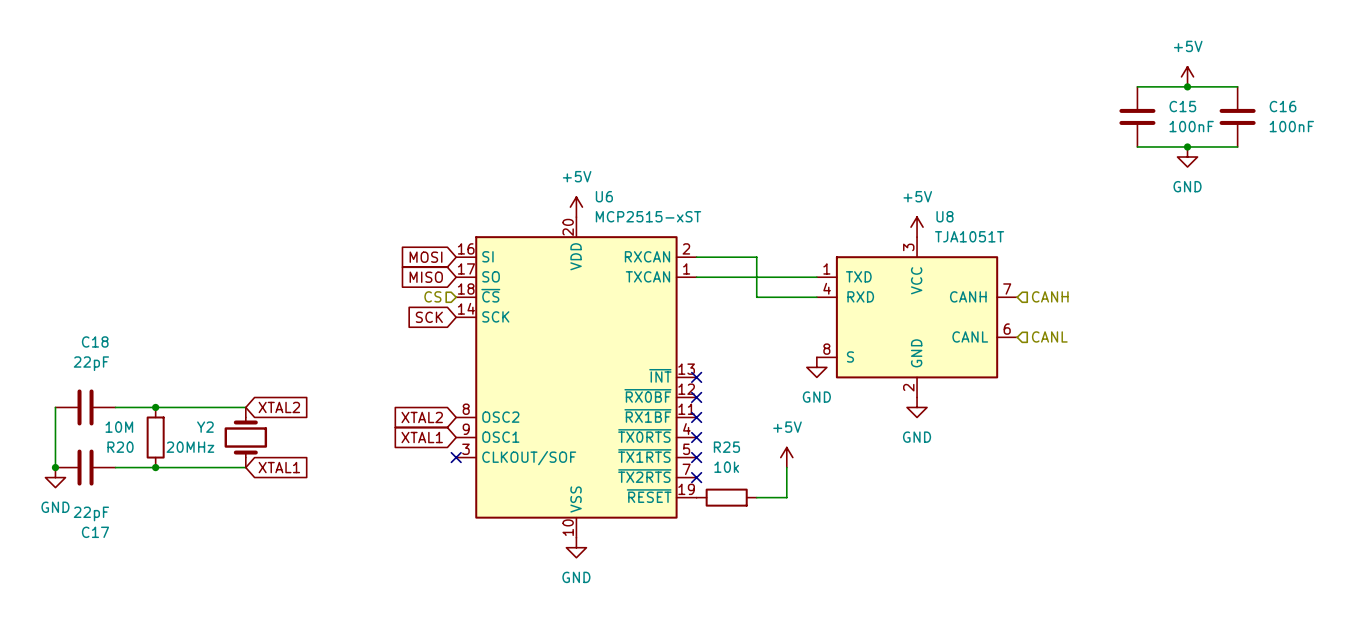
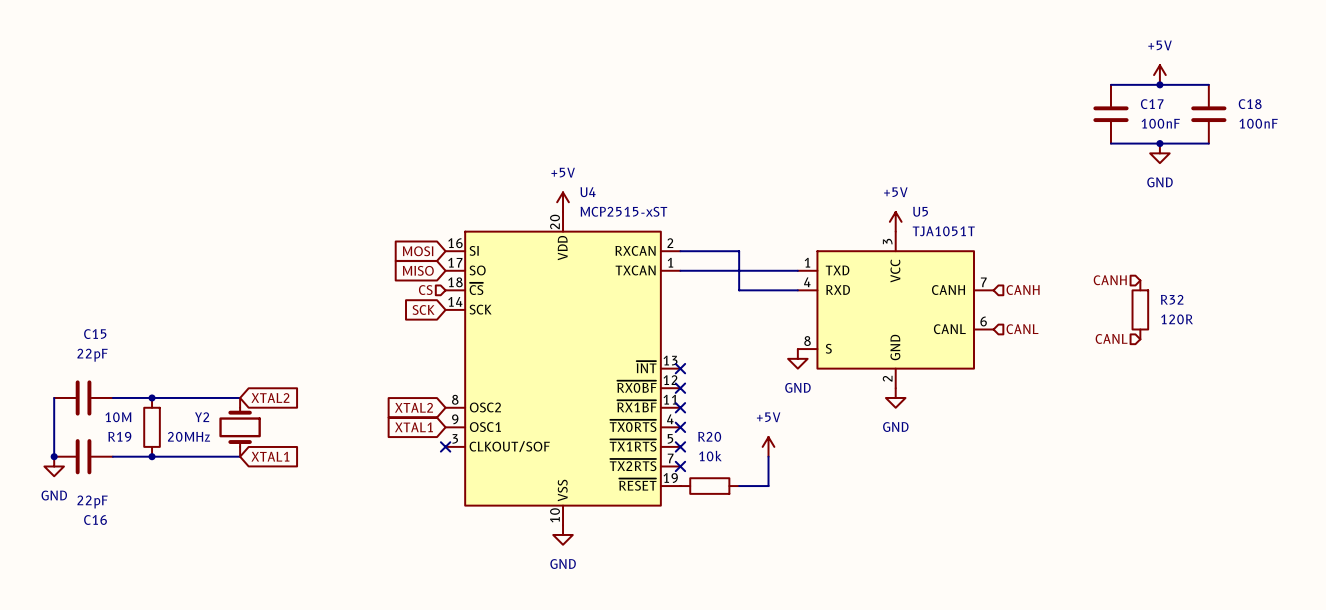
C15 name: C15 (1182, 106) -> C17 (1152, 104)
C16 name: C16 (1283, 106) -> C18 (1250, 104)
U6 name: U6 (604, 196) -> U4 (588, 192)
U8 name: U8 (944, 216) -> U5 (920, 211)
hierarchical label: none -> CANH (1110, 280)
R32: none -> 120R (1140, 309)
C18 name: C18 (95, 341) -> C15 (95, 334)
hierarchical label: none -> CANL (1111, 338)
R20 name: R20 (120, 447) -> R19 (119, 436)
R25 name: R25 (726, 447) -> R20 (709, 436)
C17 name: C17 (95, 532) -> C16 (95, 519)

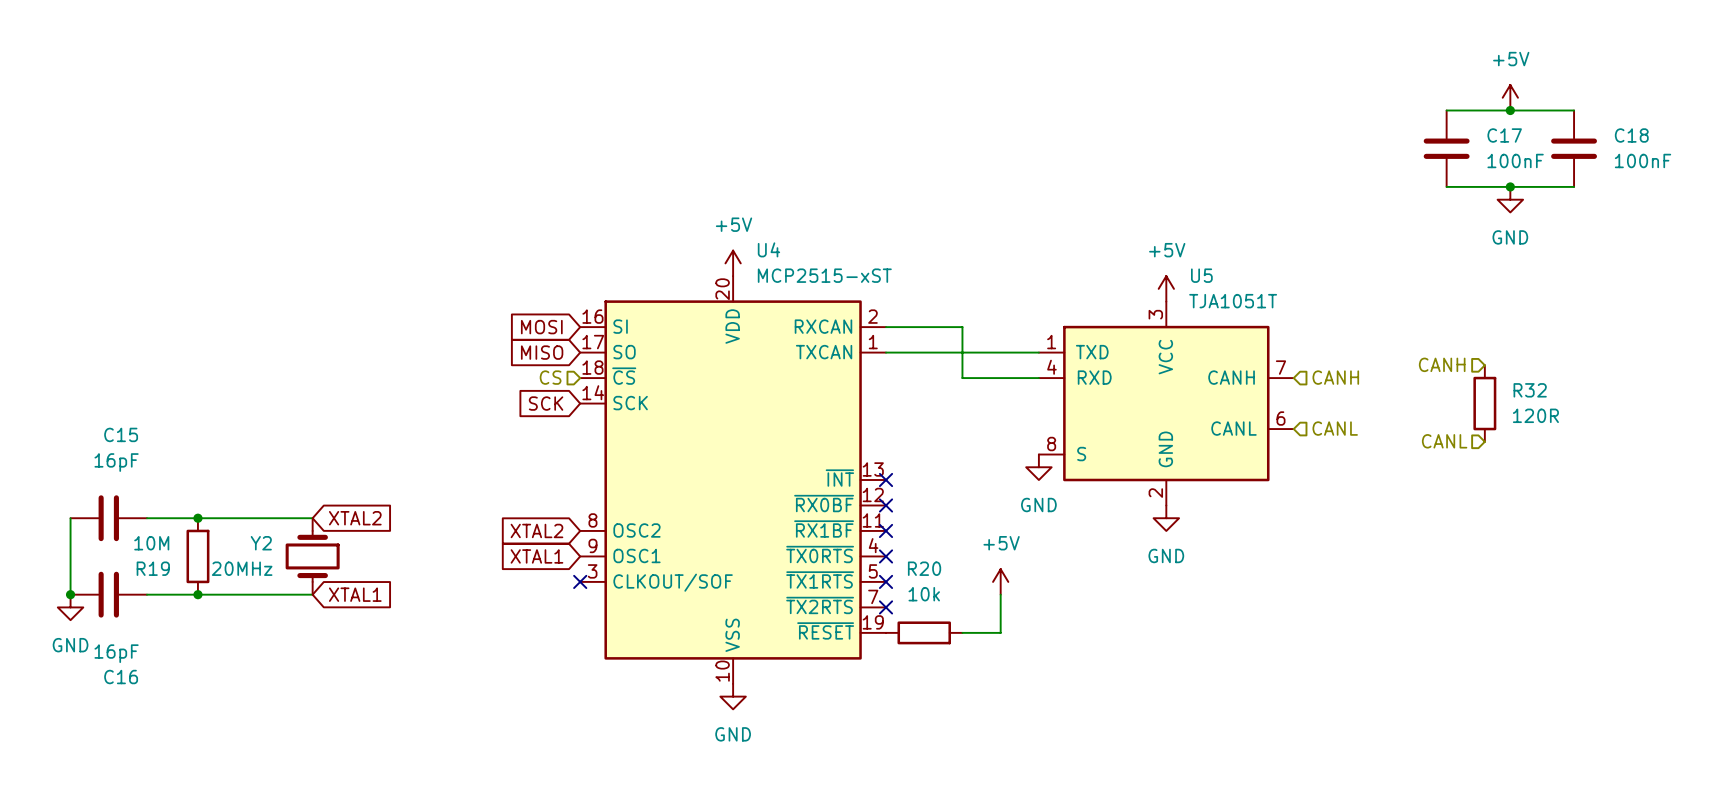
C15 value: 22pF (92, 355) -> 16pF (116, 462)
C16 value: 22pF (92, 501) -> 16pF (116, 653)

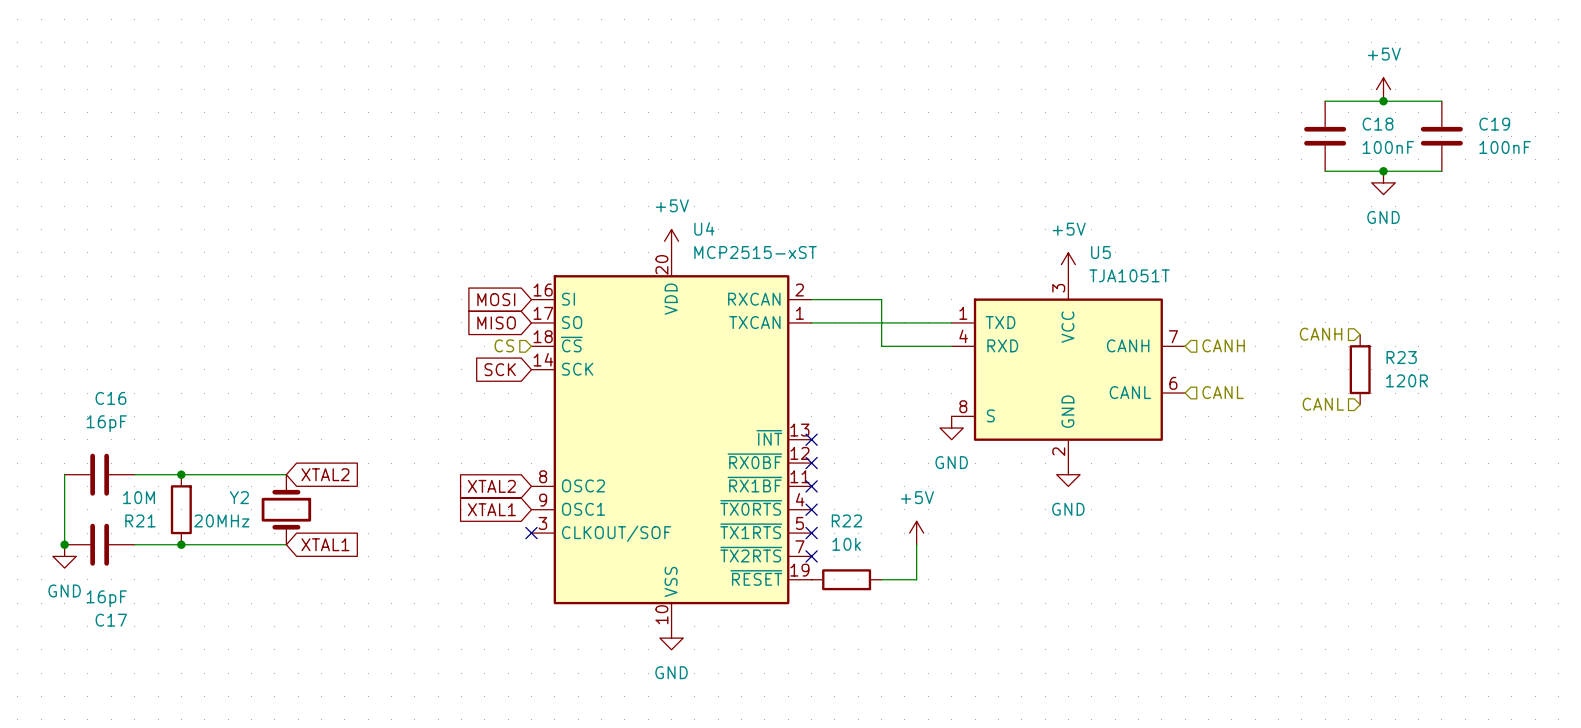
C17 name: C17 (1504, 135) -> C18 (1378, 124)
C18 name: C18 (1631, 135) -> C19 (1494, 124)
R32 name: R32 (1530, 390) -> R23 (1401, 357)
C15 name: C15 (121, 434) -> C16 (110, 398)
R19 name: R19 (153, 568) -> R21 (140, 520)
R20 name: R20 (924, 568) -> R22 (846, 520)
C16 name: C16 (121, 677) -> C17 (111, 620)

